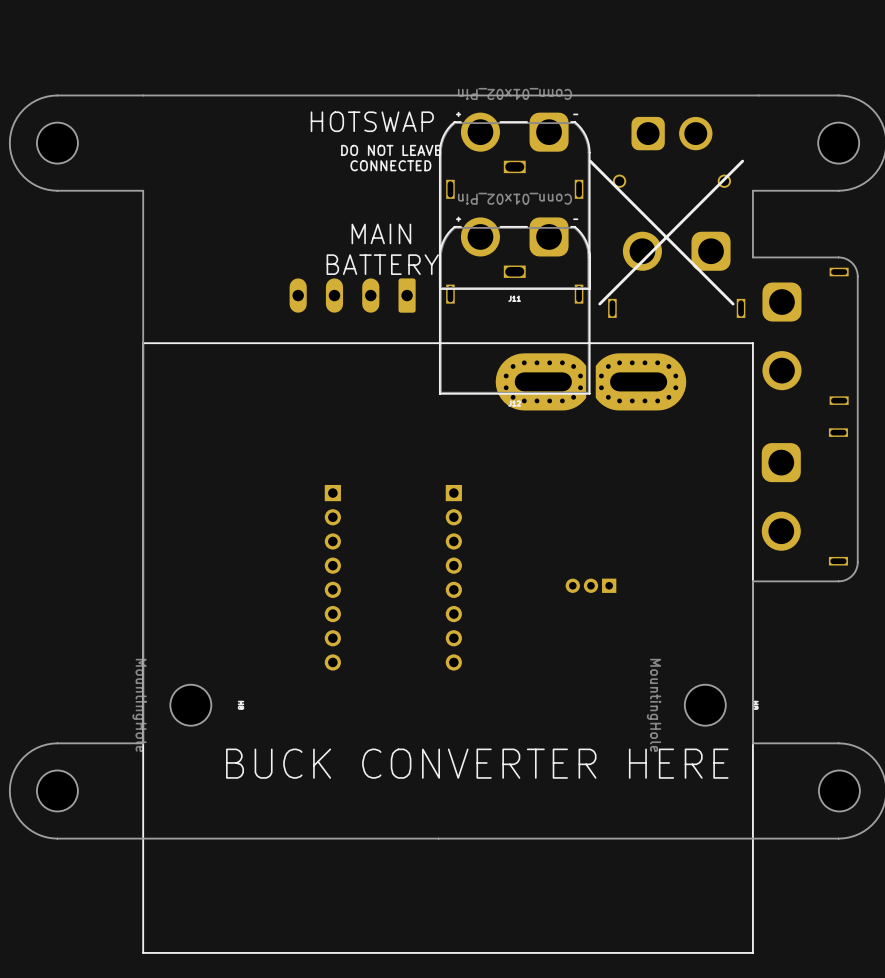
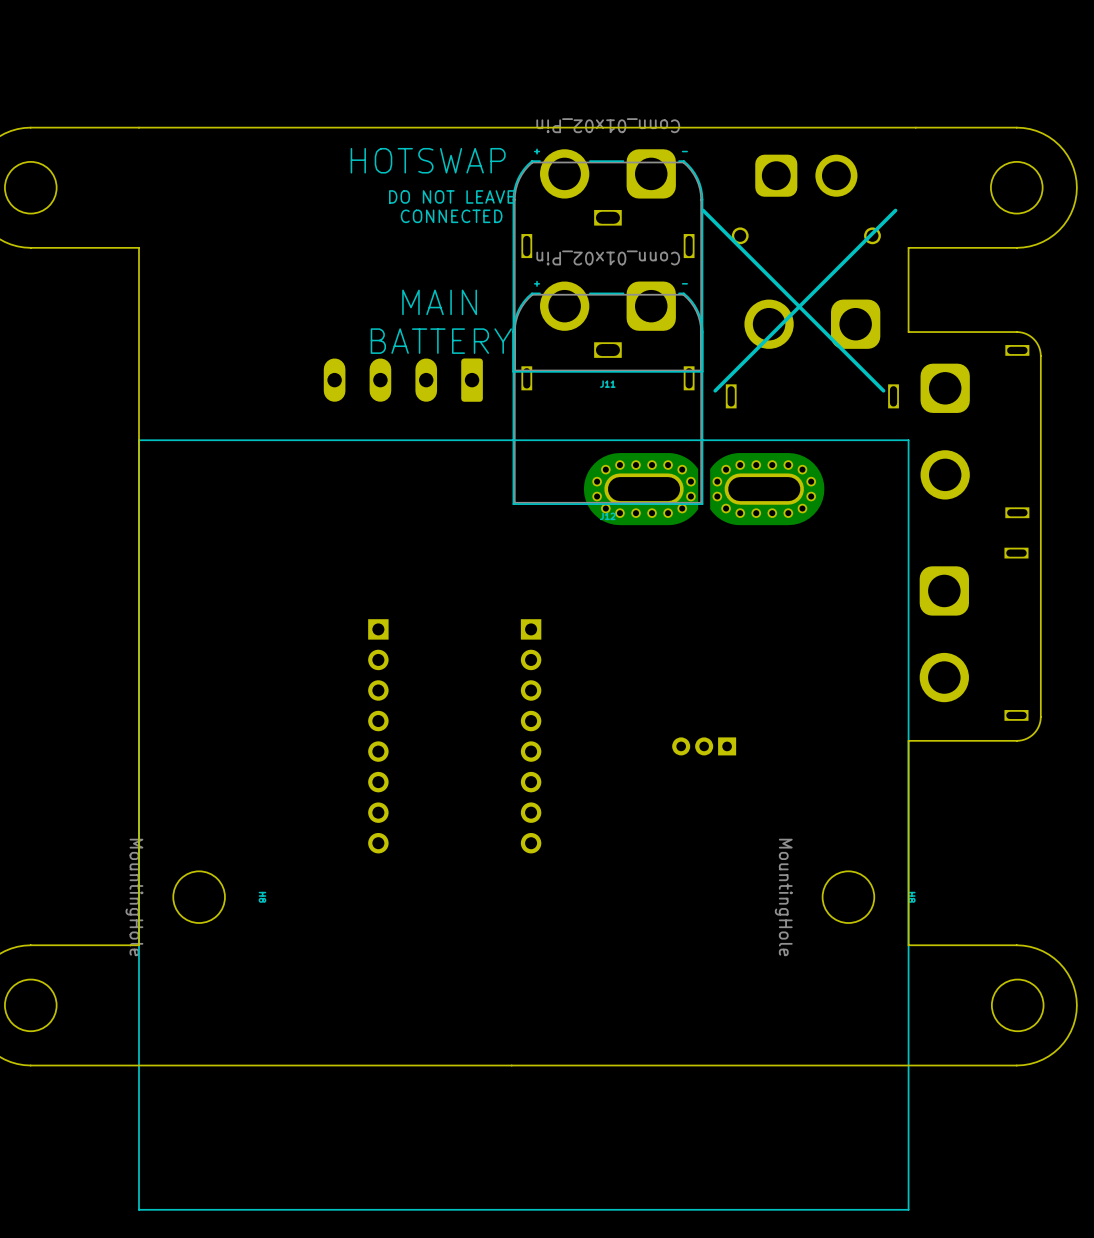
text: BUCK CONVERTER HERE (477, 763) -> none

